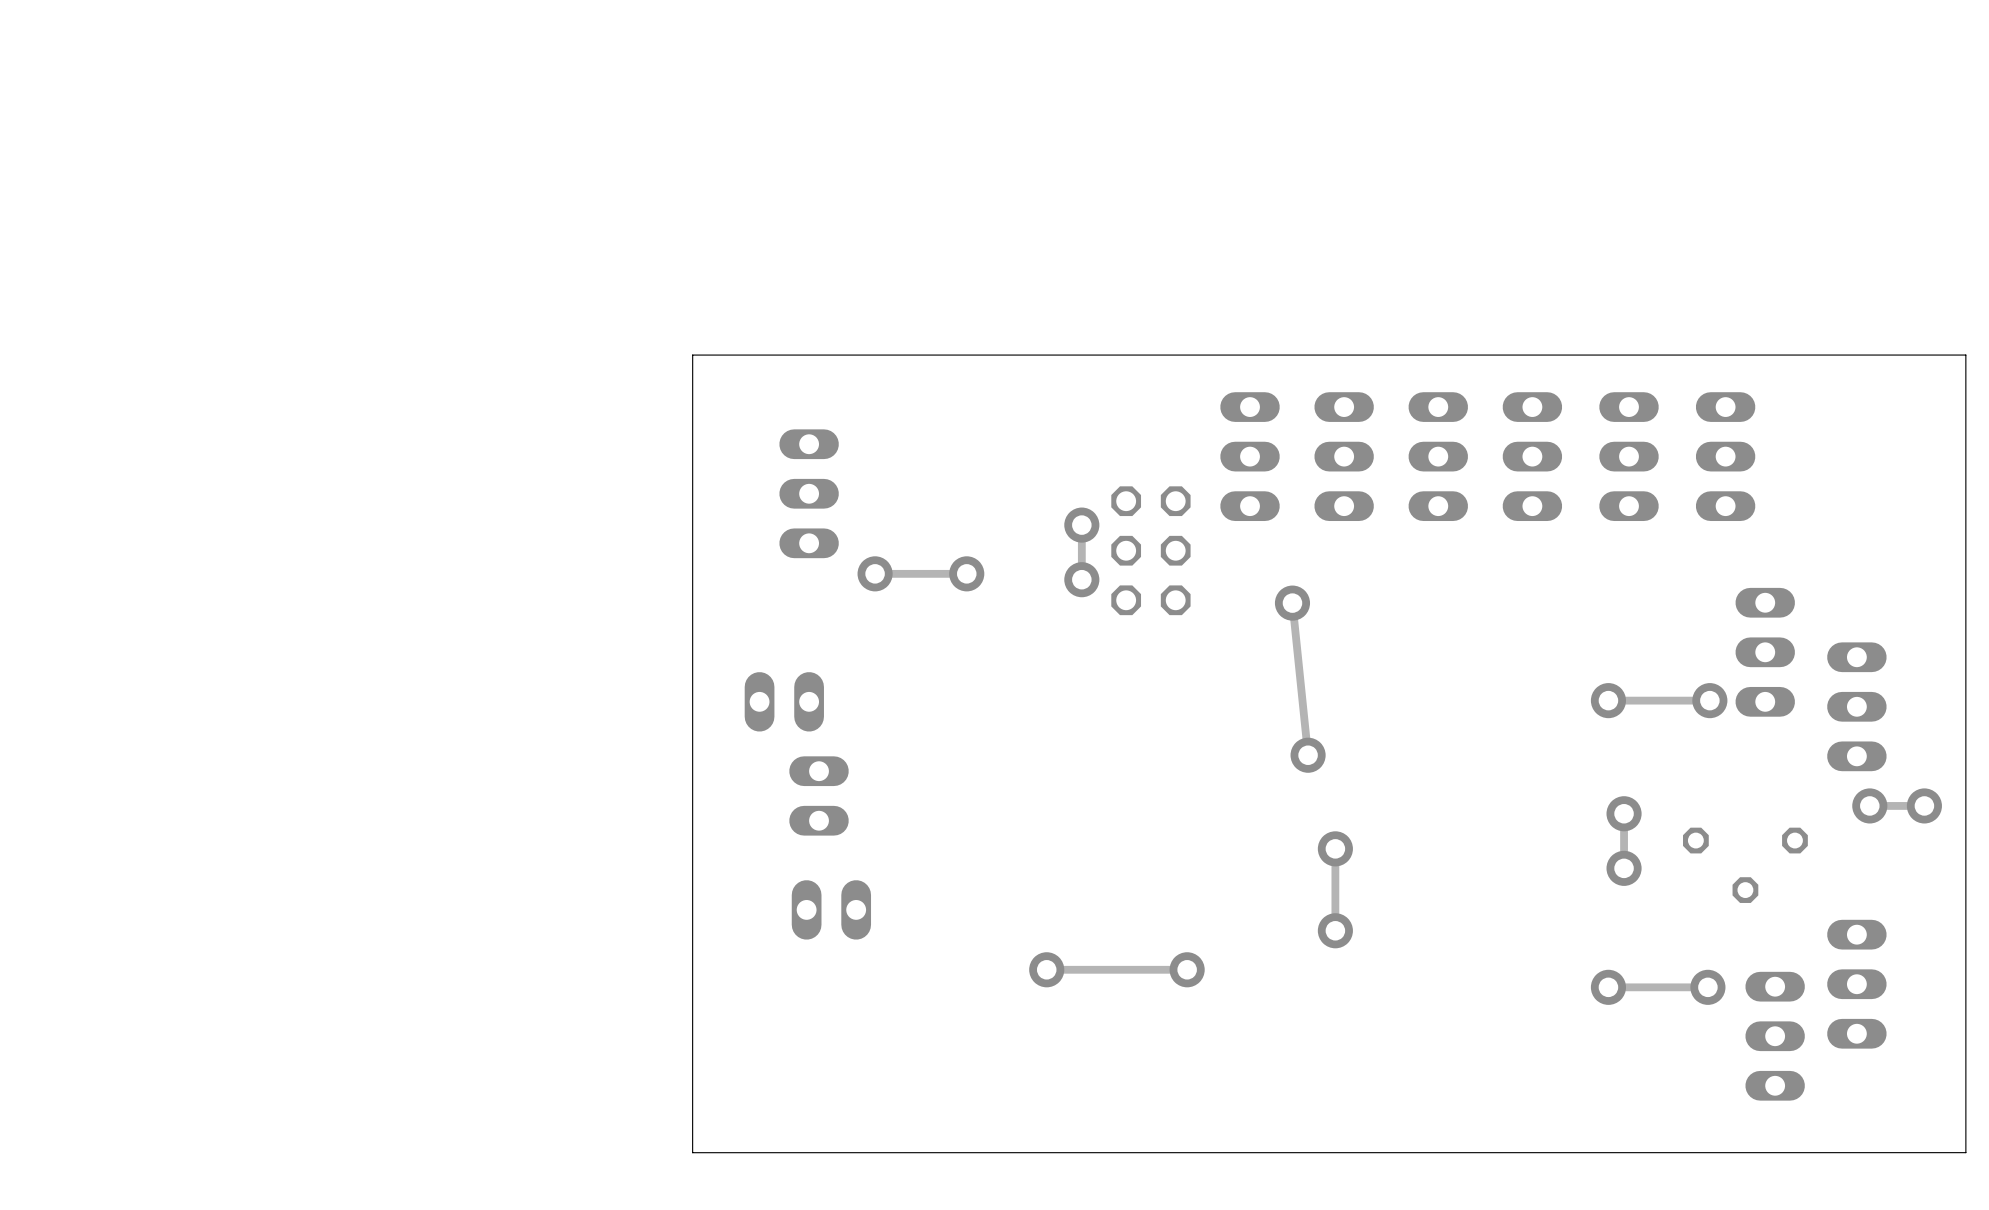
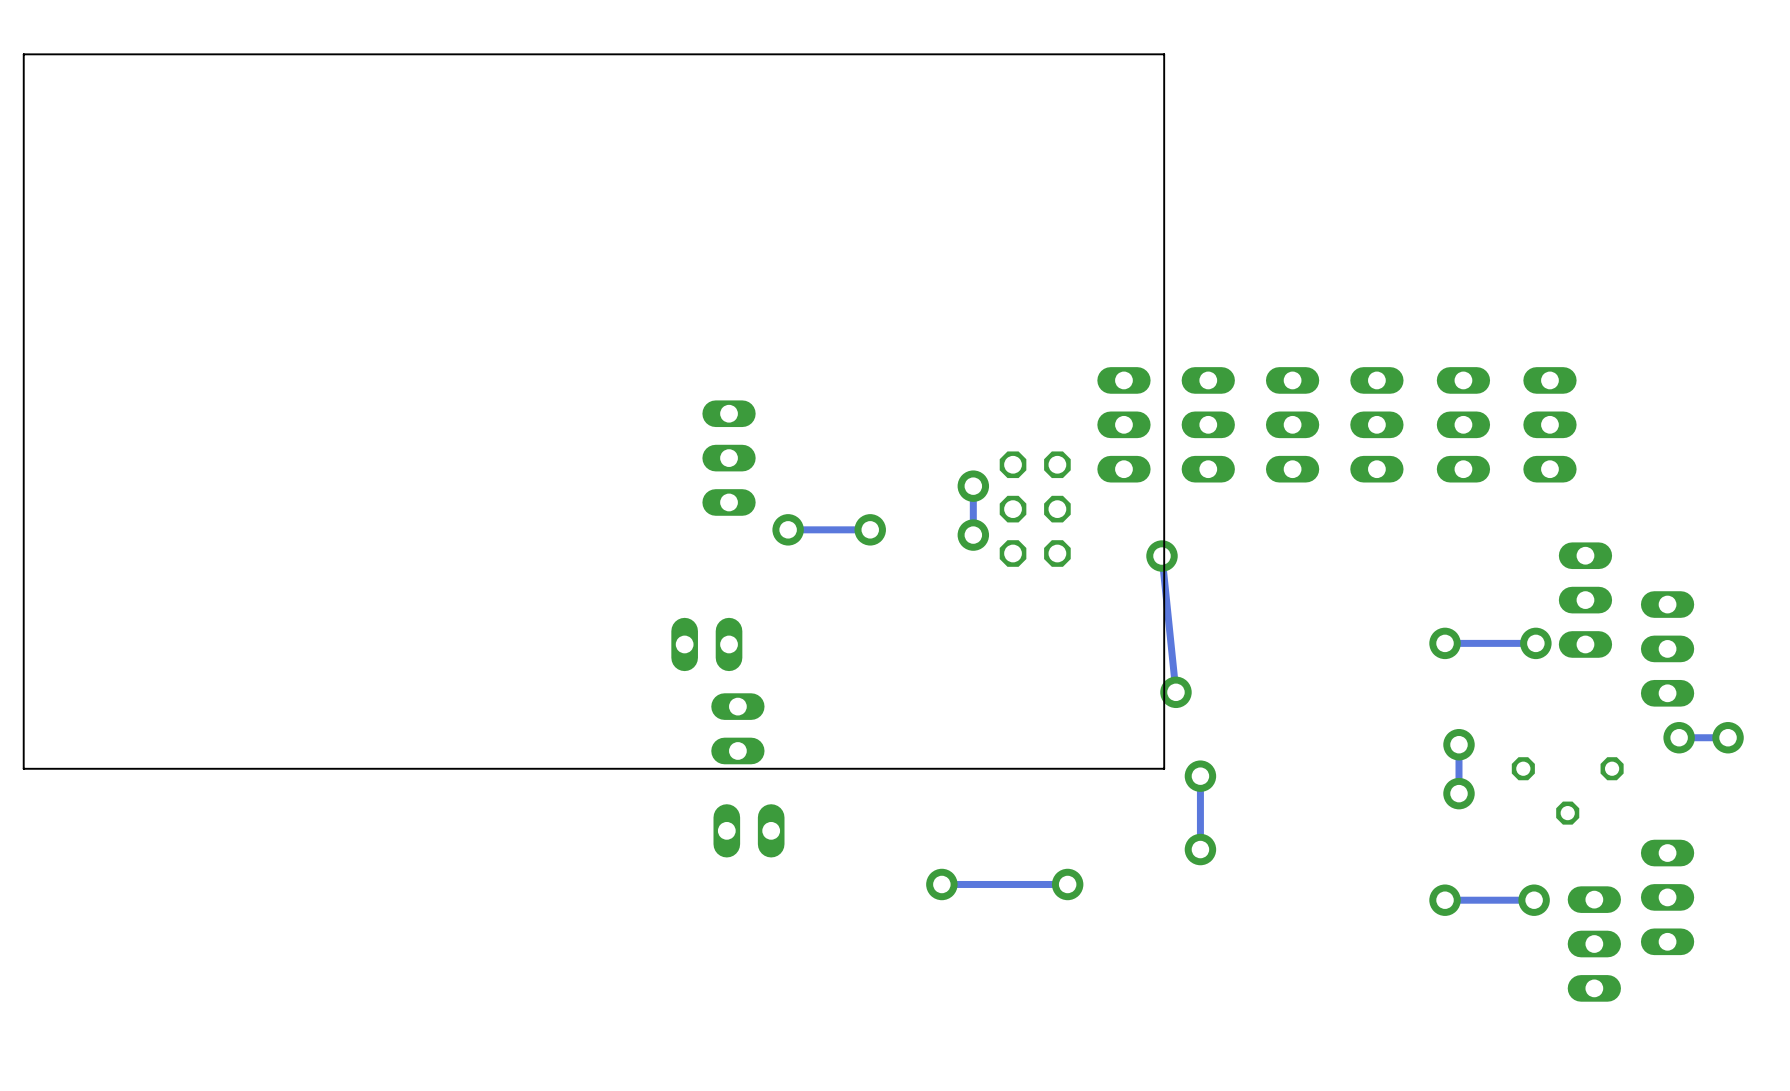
board edge: none -> (1164, 54) (23, 54) (23, 768) (1164, 768) (1164, 54)
board edge: (1965, 355) (692, 355) (692, 1152) (1965, 1152) (1965, 355) -> none

